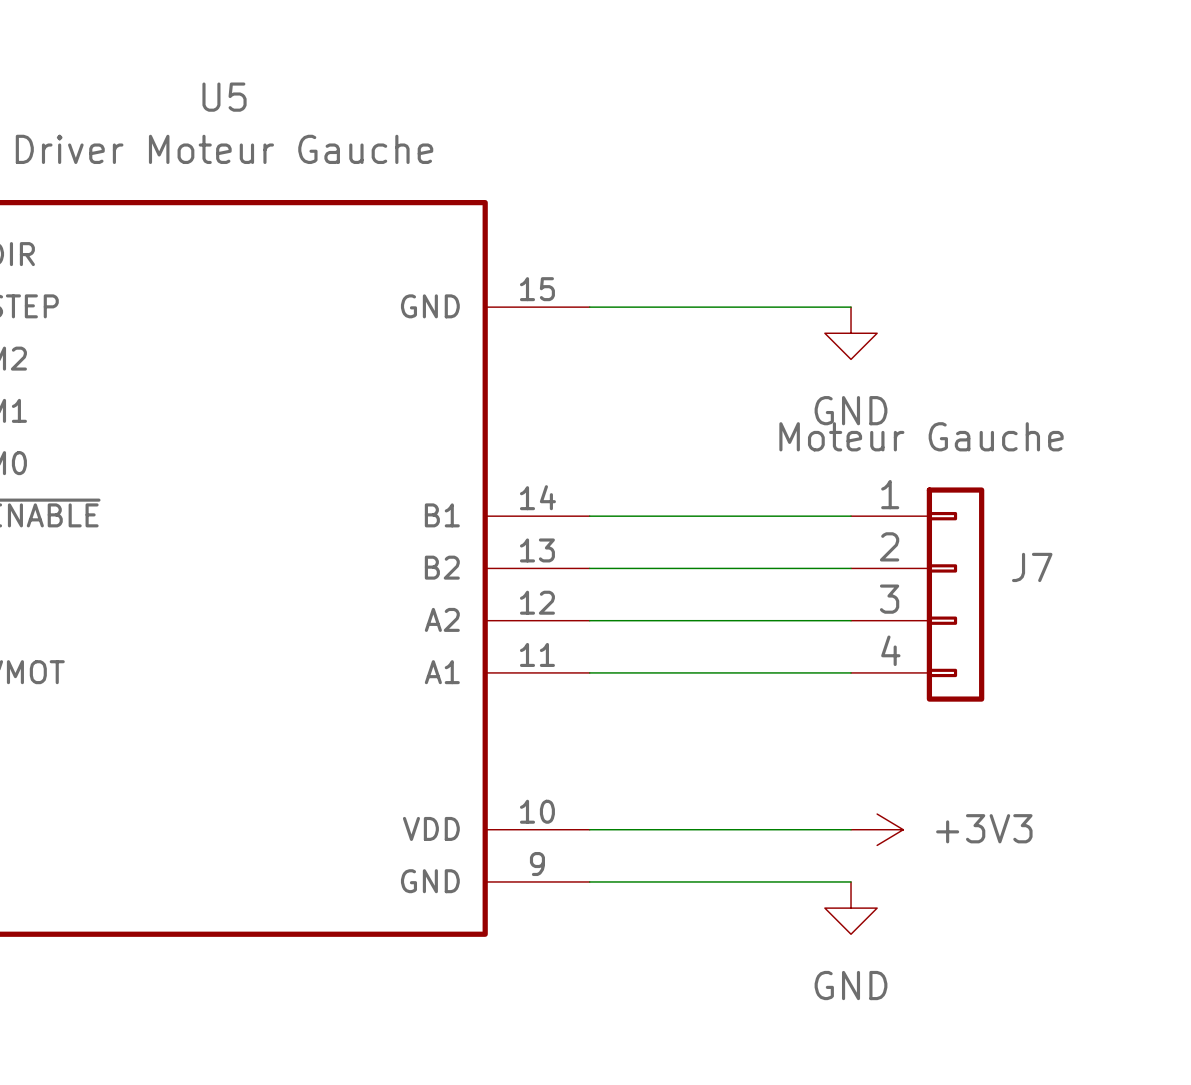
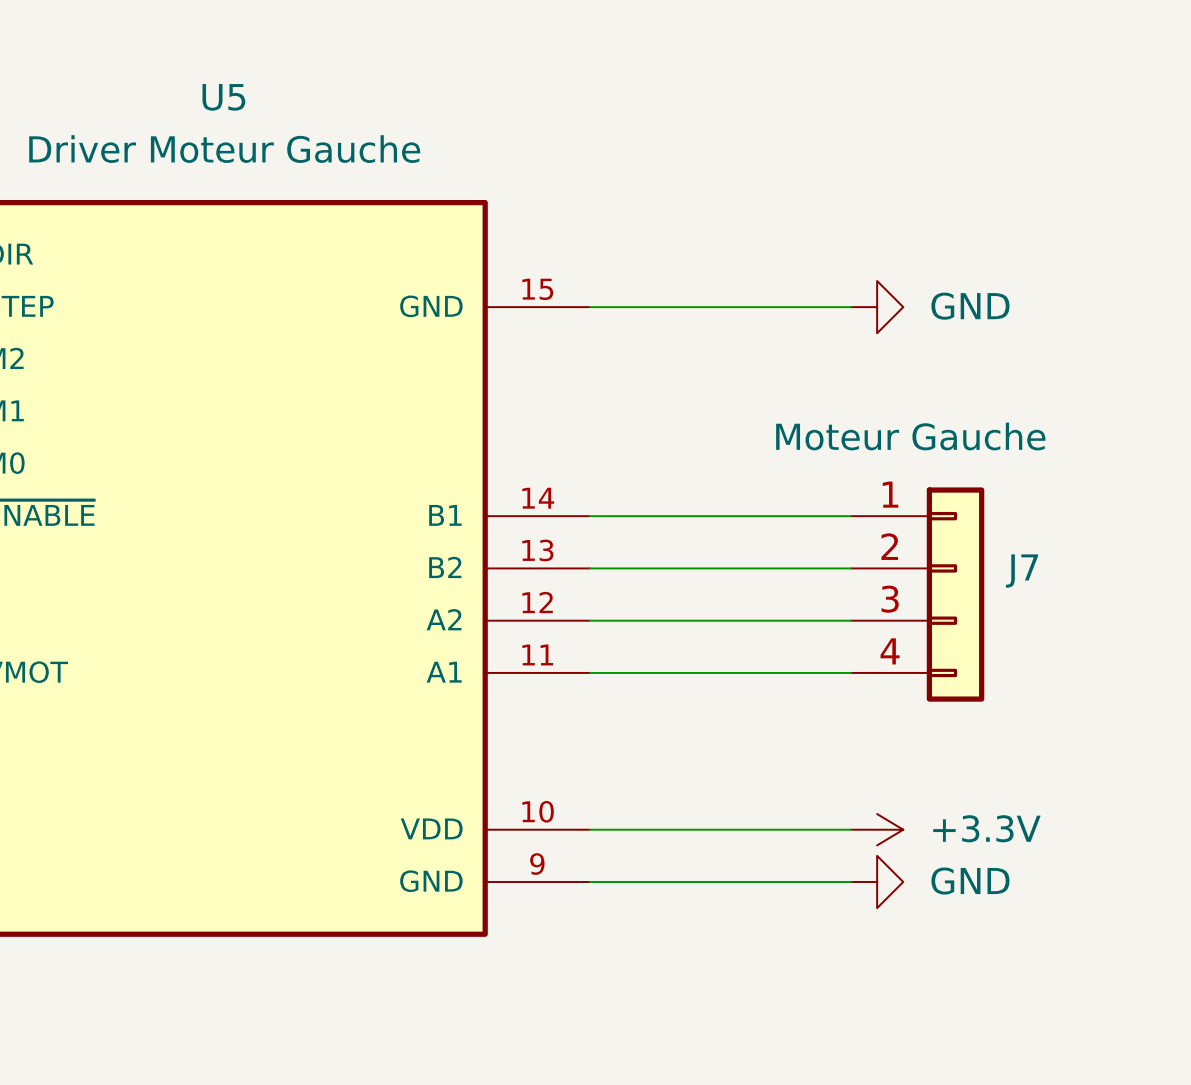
power symbol rotation: 0° (851, 333) -> 90° counterclockwise (877, 307)
power symbol position: GND (851, 333) -> GND (877, 307)
power symbol: +3V3 (877, 829) -> +3.3V (877, 829)
power symbol rotation: 0° (851, 908) -> 90° counterclockwise (877, 881)
power symbol position: GND (851, 908) -> GND (877, 881)

